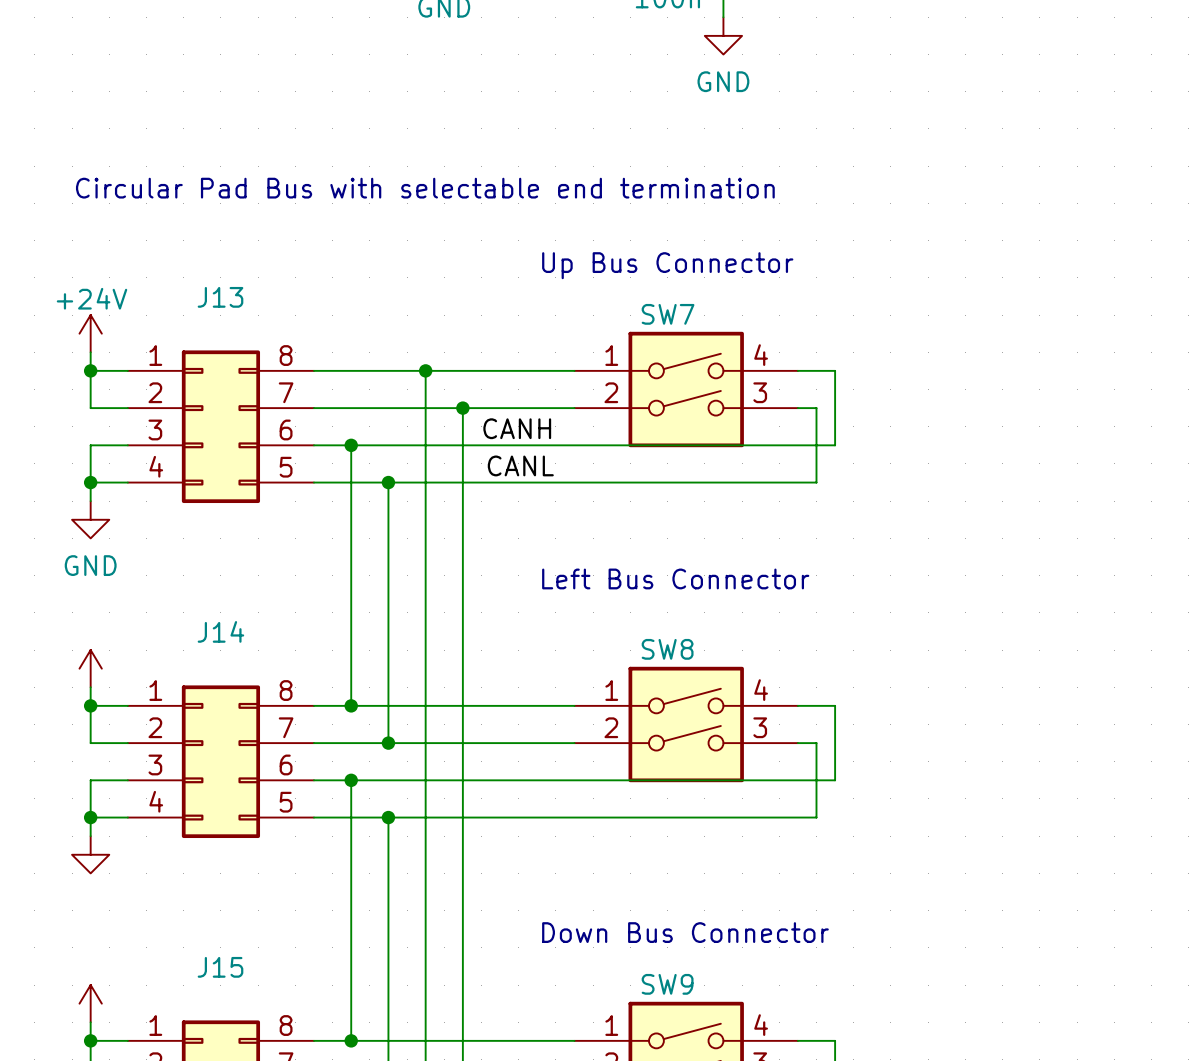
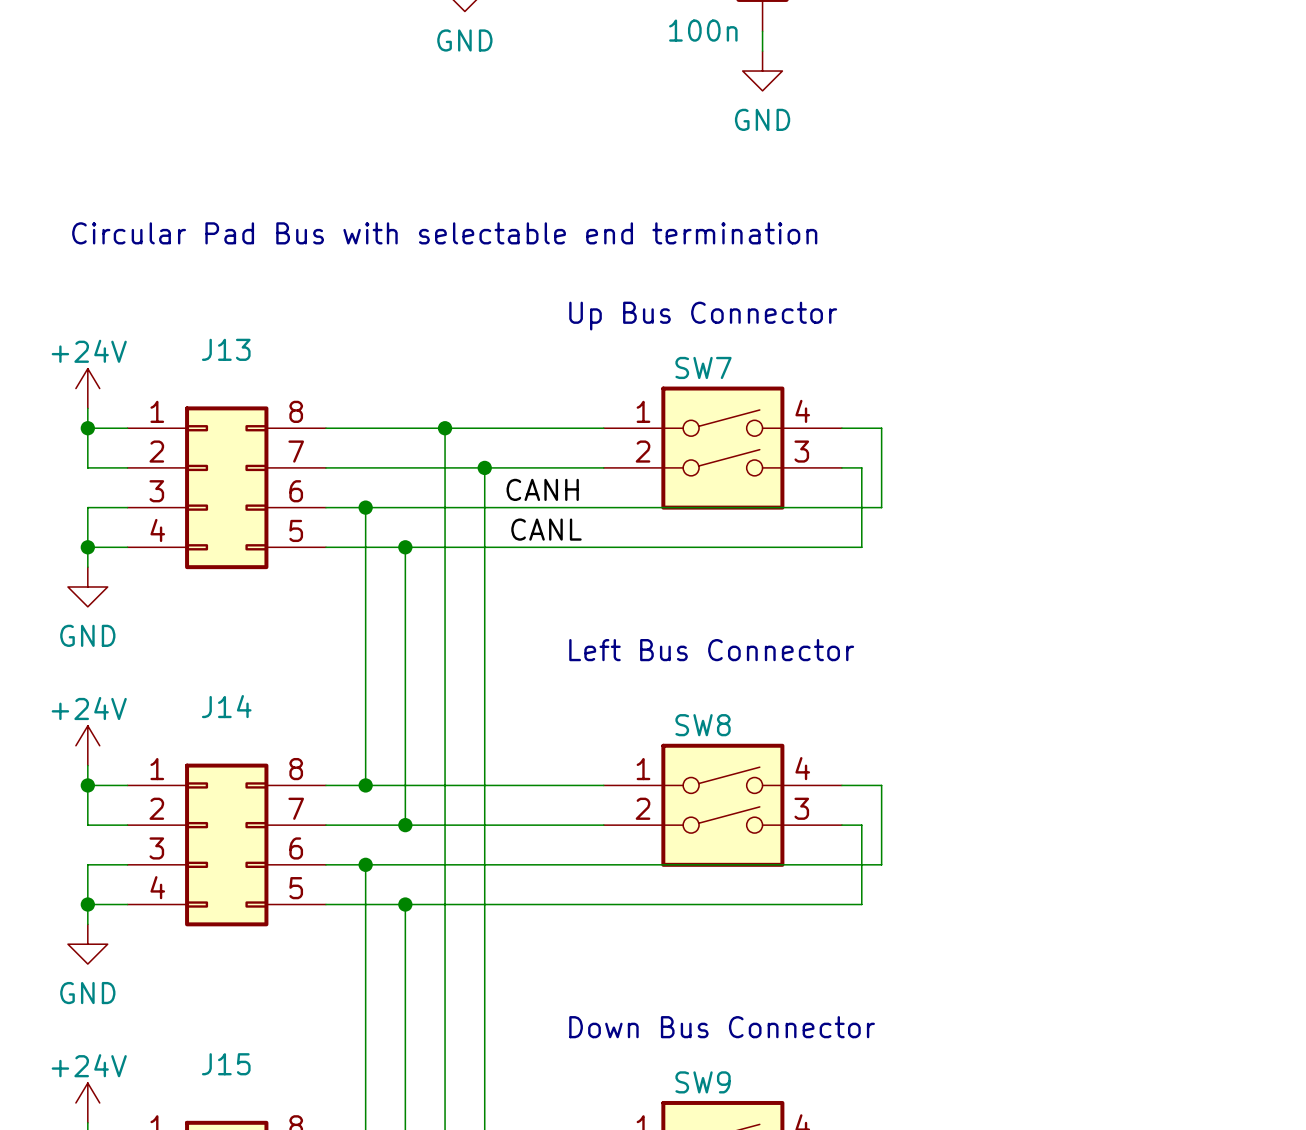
power symbol text: none -> +24V (89, 708)
power symbol text: none -> GND (87, 993)
power symbol text: none -> +24V (89, 1065)

